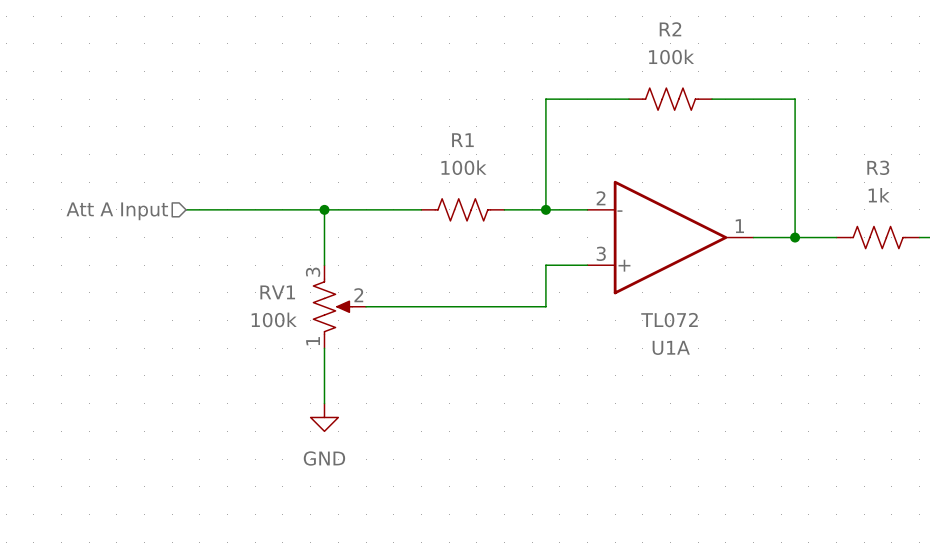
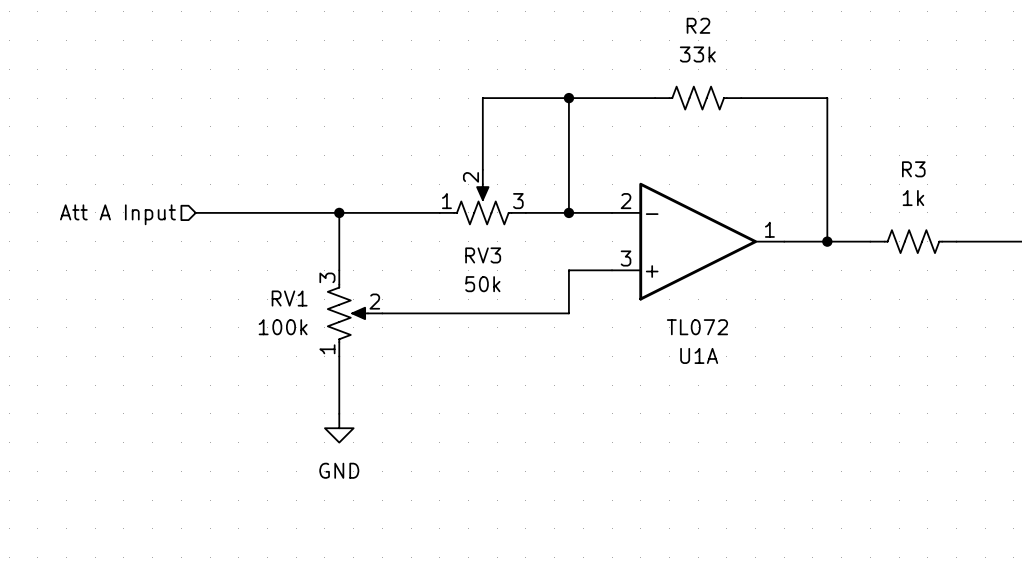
R2 value: 100k (671, 56) -> 33k (697, 54)
wire: none -> (568, 98) (482, 98) (482, 169)
junction: none -> (568, 98)
RV3: none -> 50k (482, 197)
R1: 100k (462, 209) -> none

